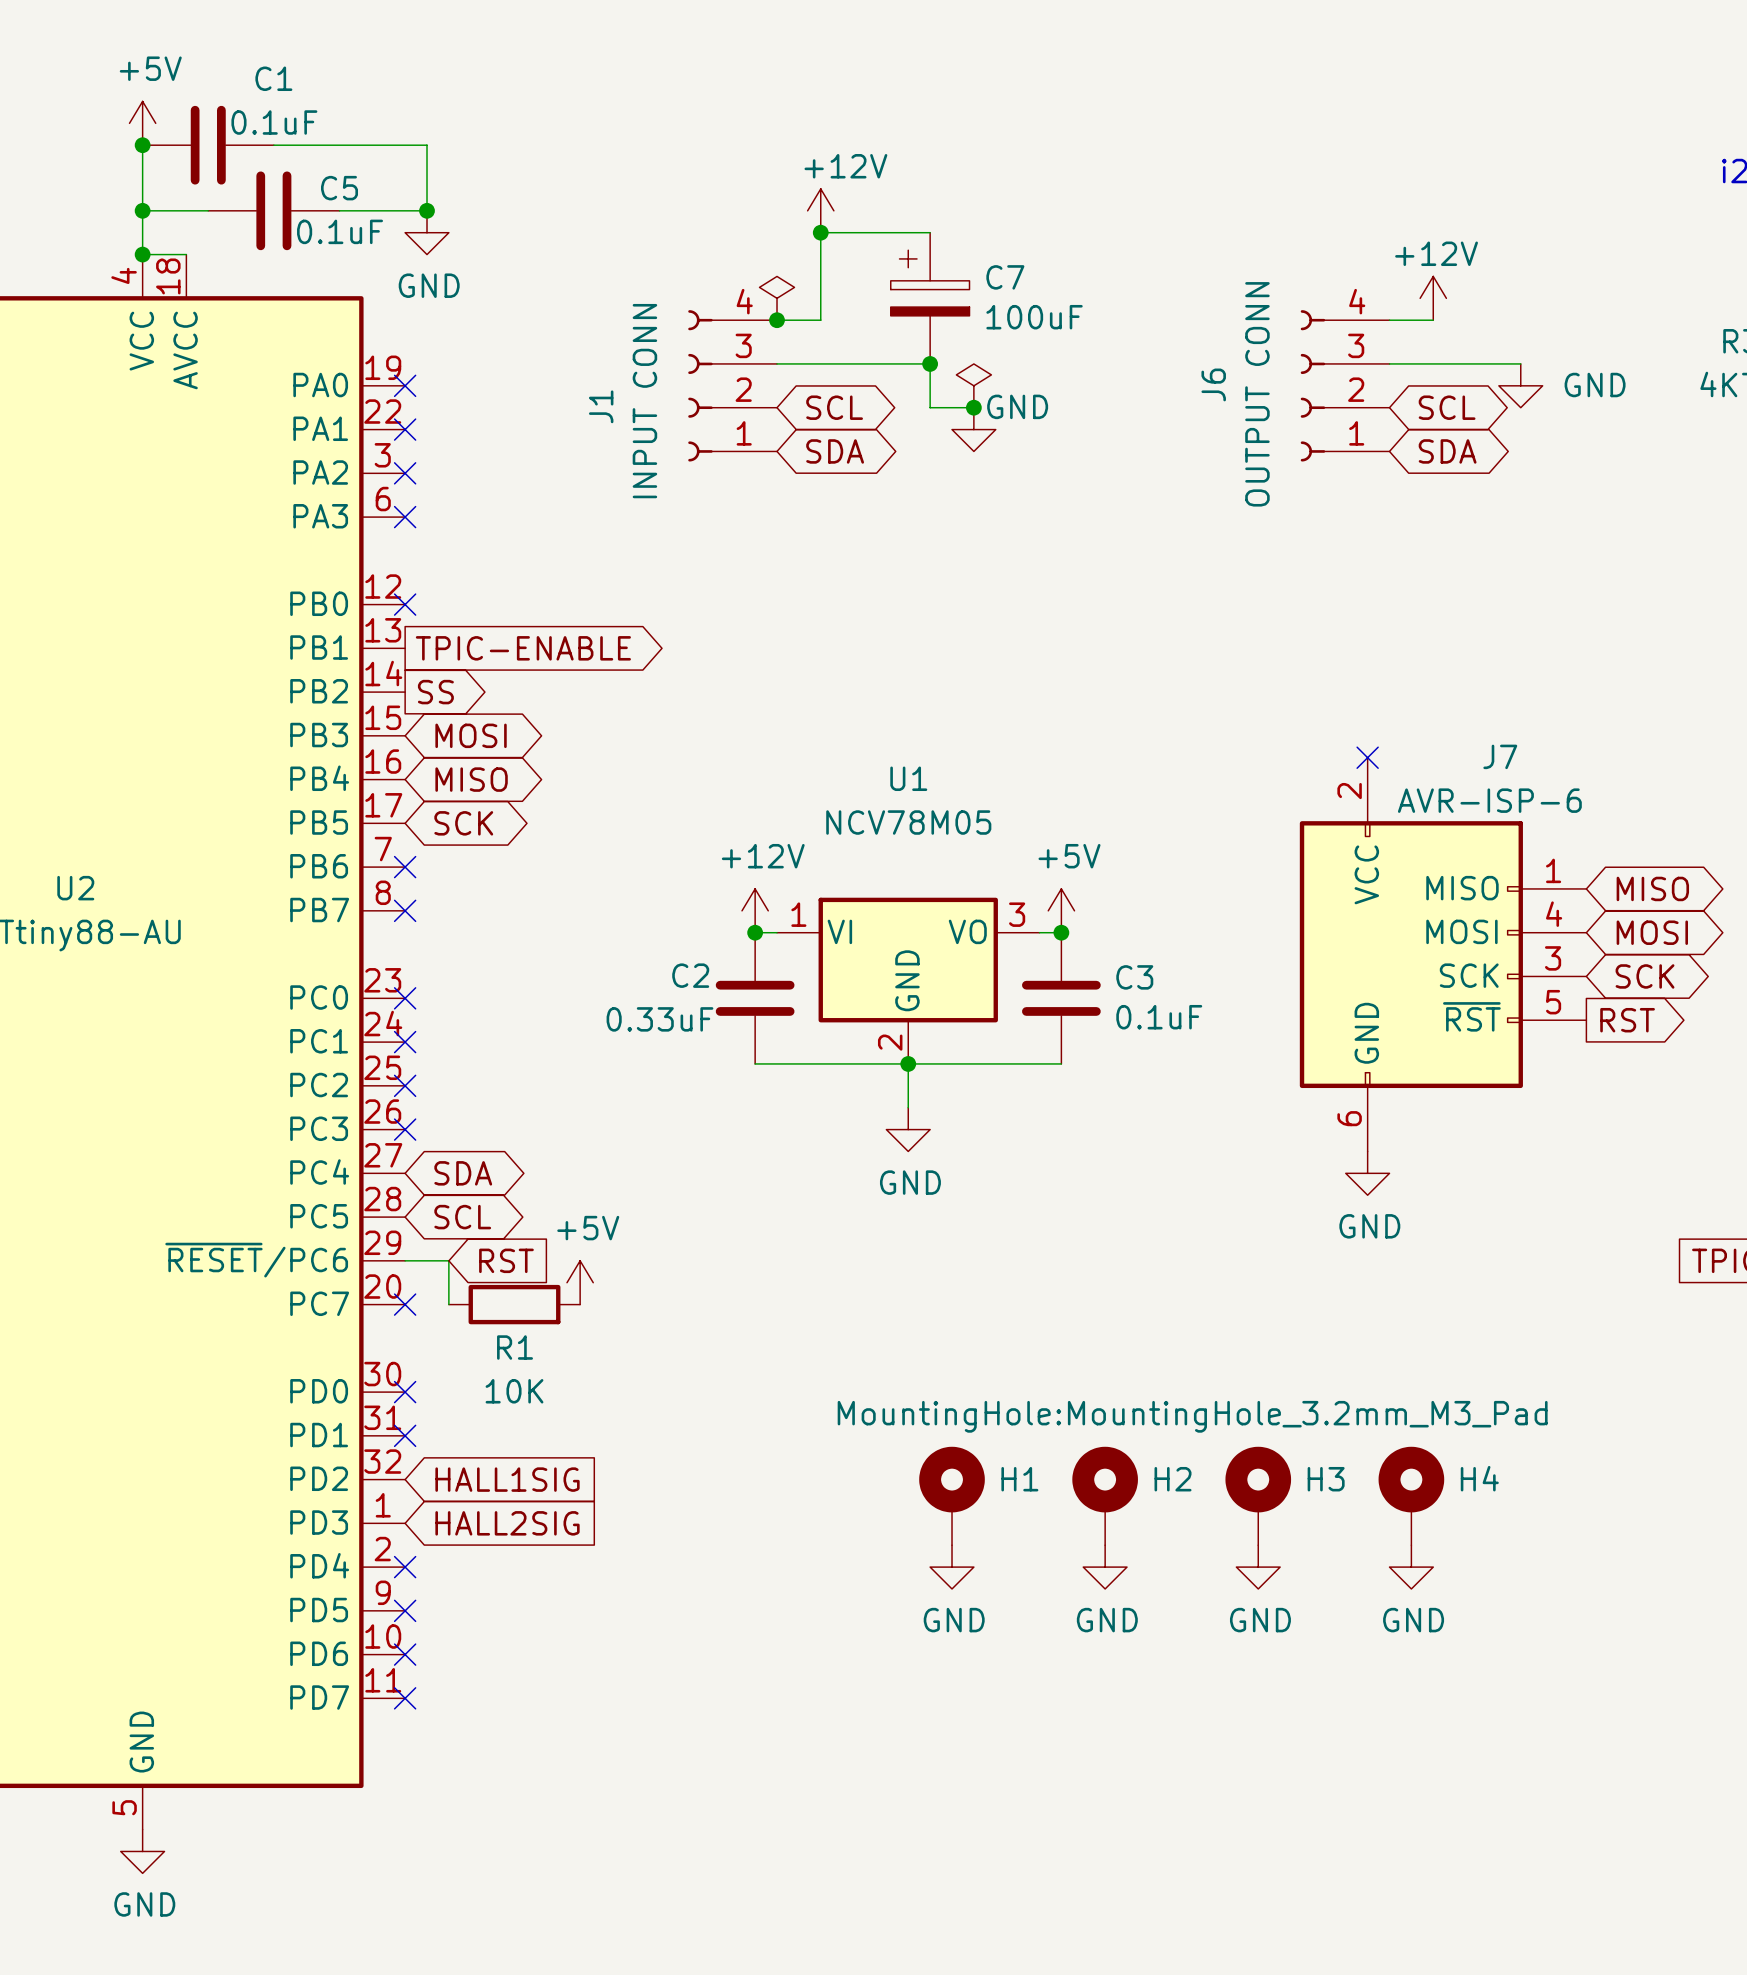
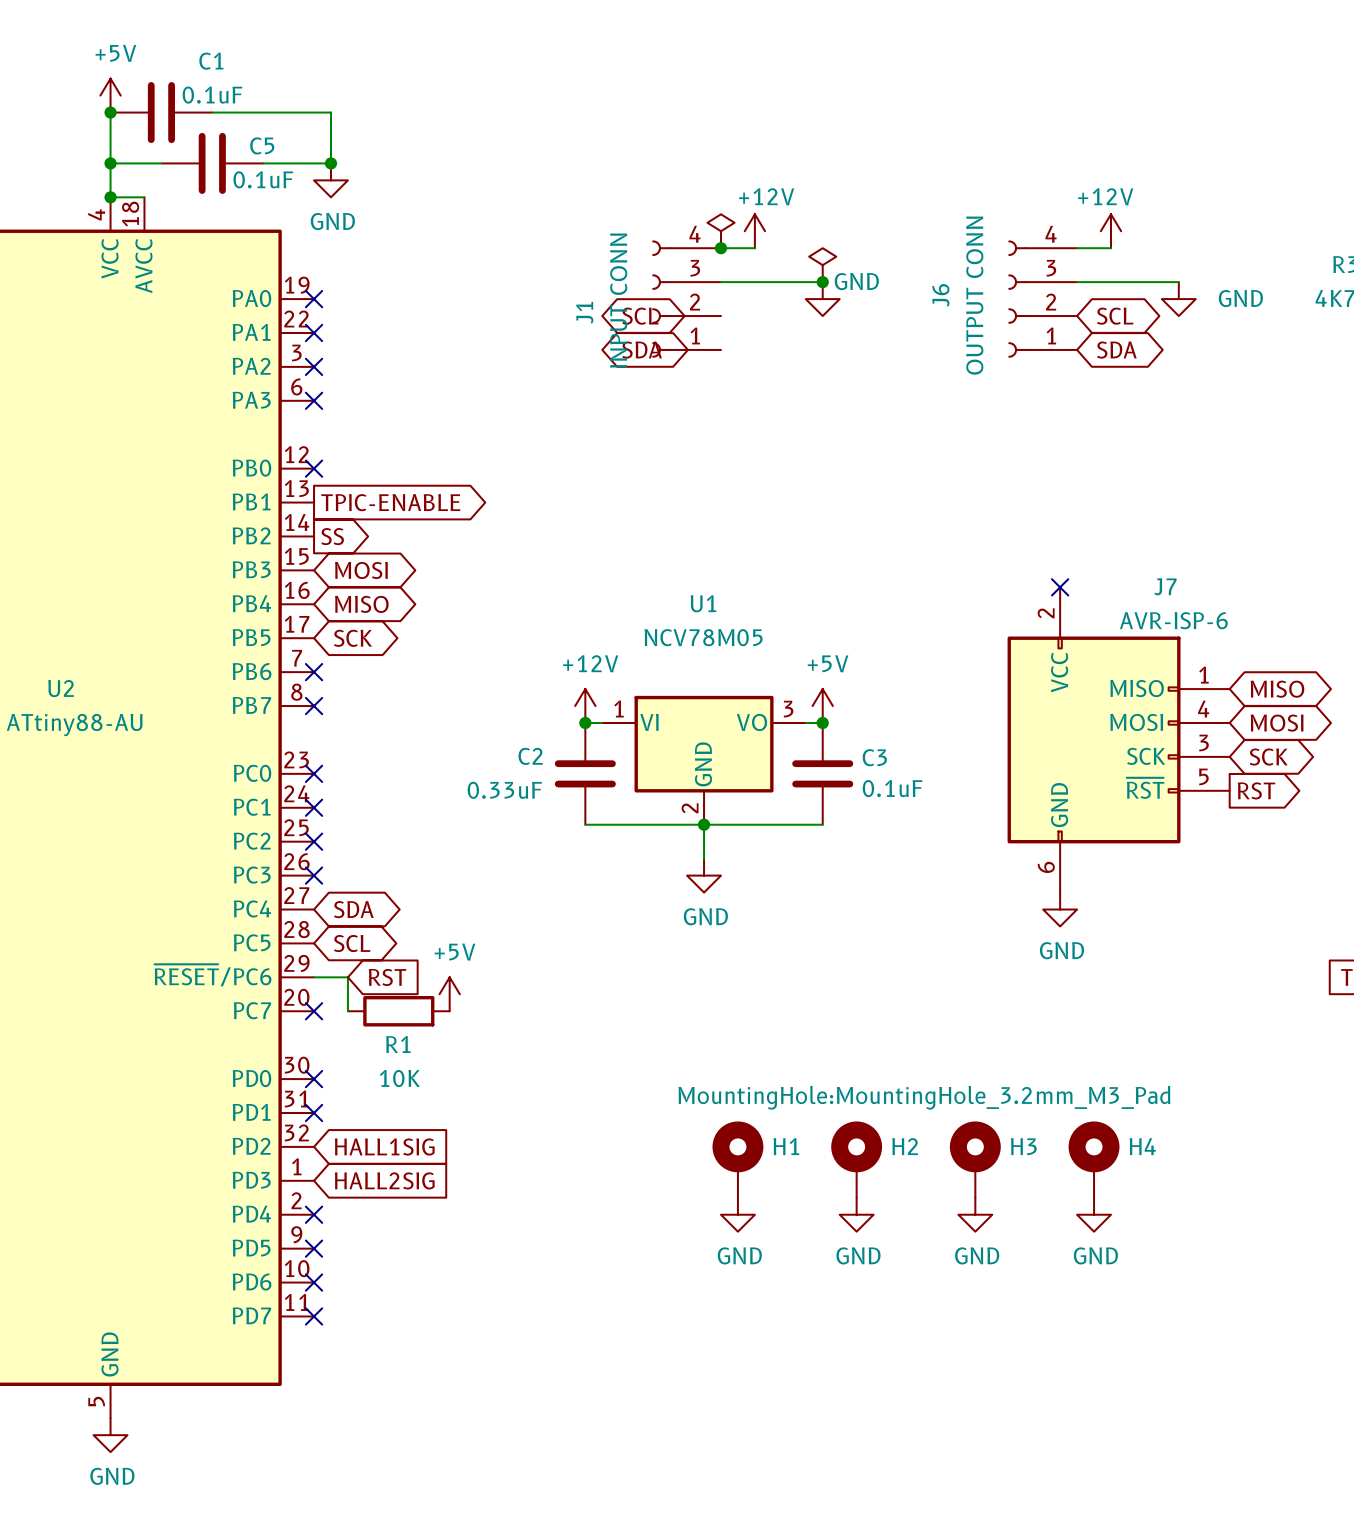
power symbol position: +12V (820, 210) -> +12V (754, 231)
junction: (820, 232) -> none
wire: (930, 232) (820, 232) (820, 320) (777, 320) -> none
power symbol: (777, 298) -> none
C7: 100uF (930, 298) -> none
power symbol: none -> (720, 231)
junction: (777, 320) -> none
wire: none -> (720, 248) (754, 248)
power symbol: none -> (822, 265)
wire: (777, 363) (930, 363) (930, 407) (973, 407) -> none
wire: none -> (720, 282) (822, 282)
junction position: (930, 363) -> (720, 248)
junction: none -> (822, 282)
J1 position: (732, 385) -> (686, 299)
power symbol: (973, 385) -> none
junction: (973, 407) -> none
power symbol position: GND (973, 429) -> GND (822, 299)

